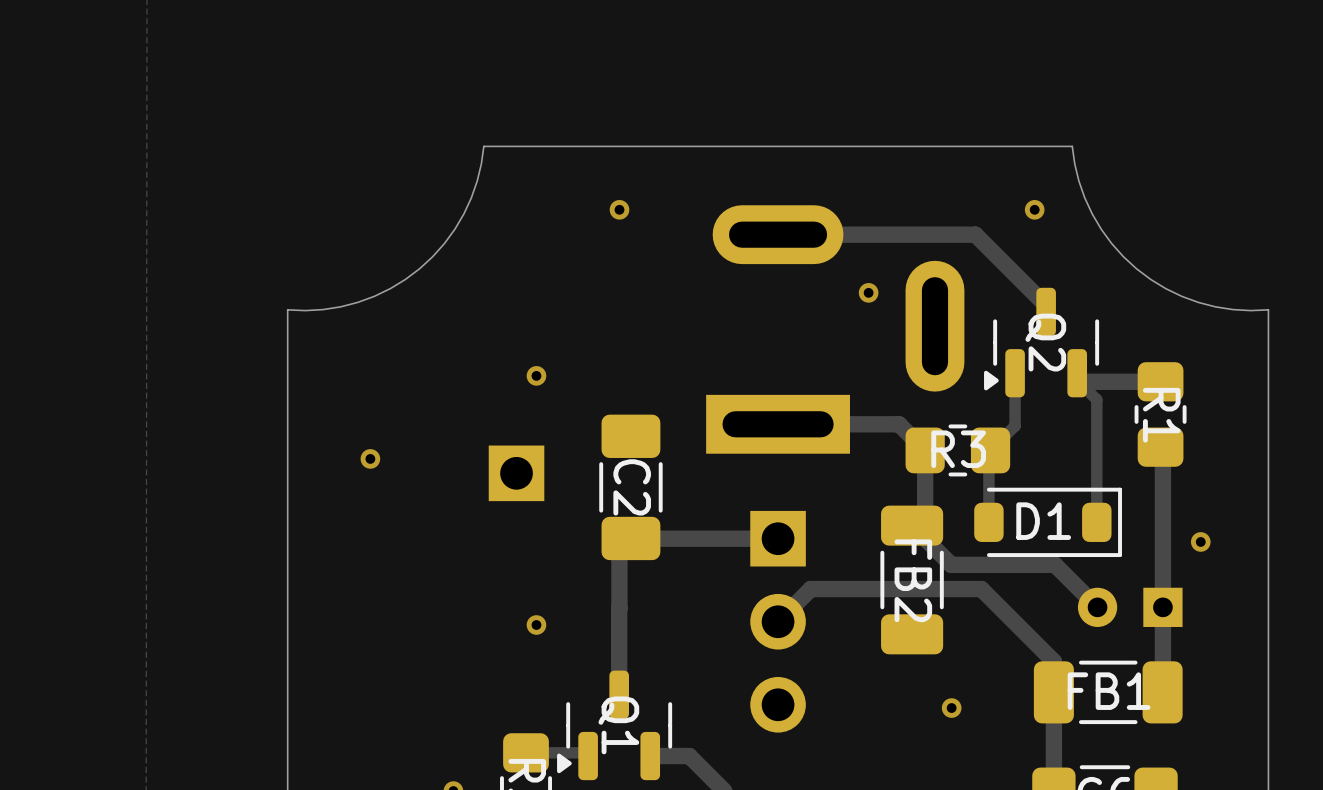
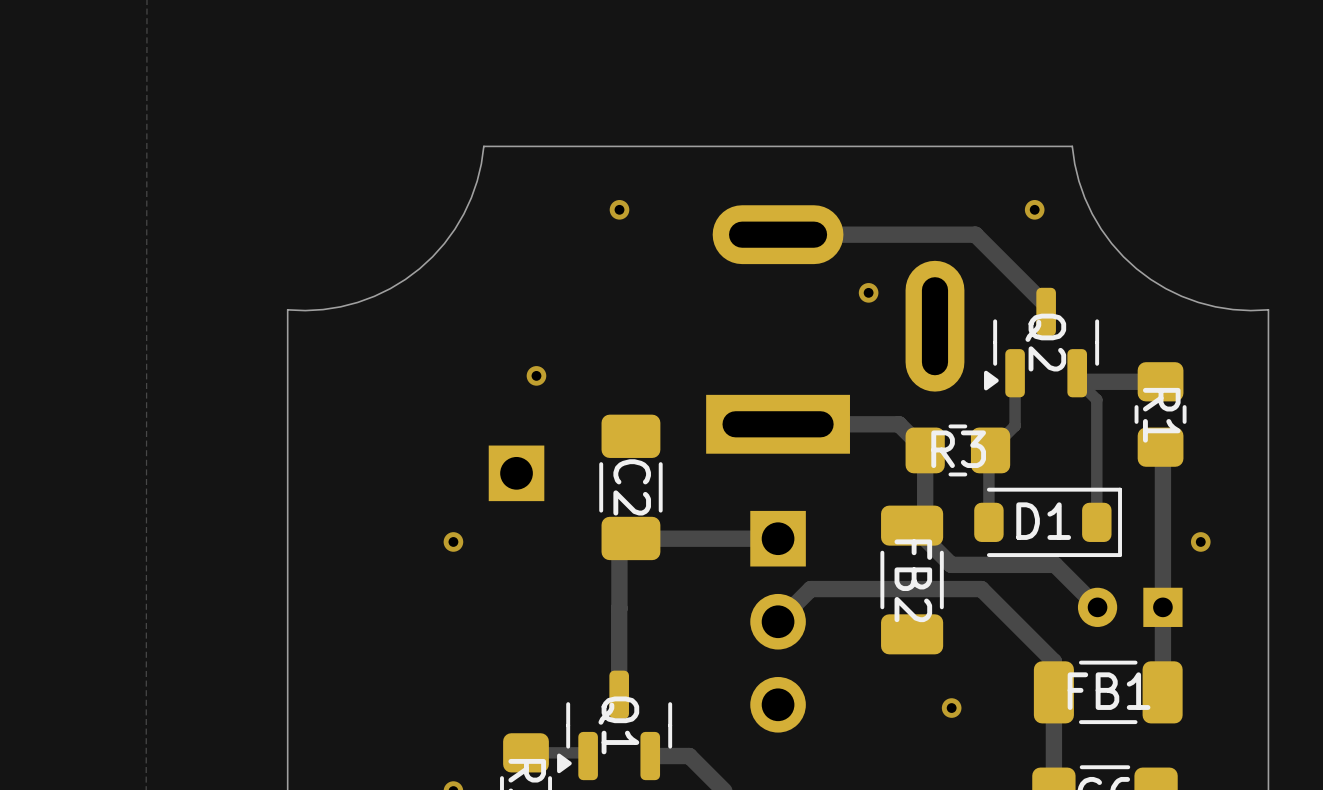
via: (370, 458) -> none
via: none -> (453, 541)
via: (536, 625) -> none

